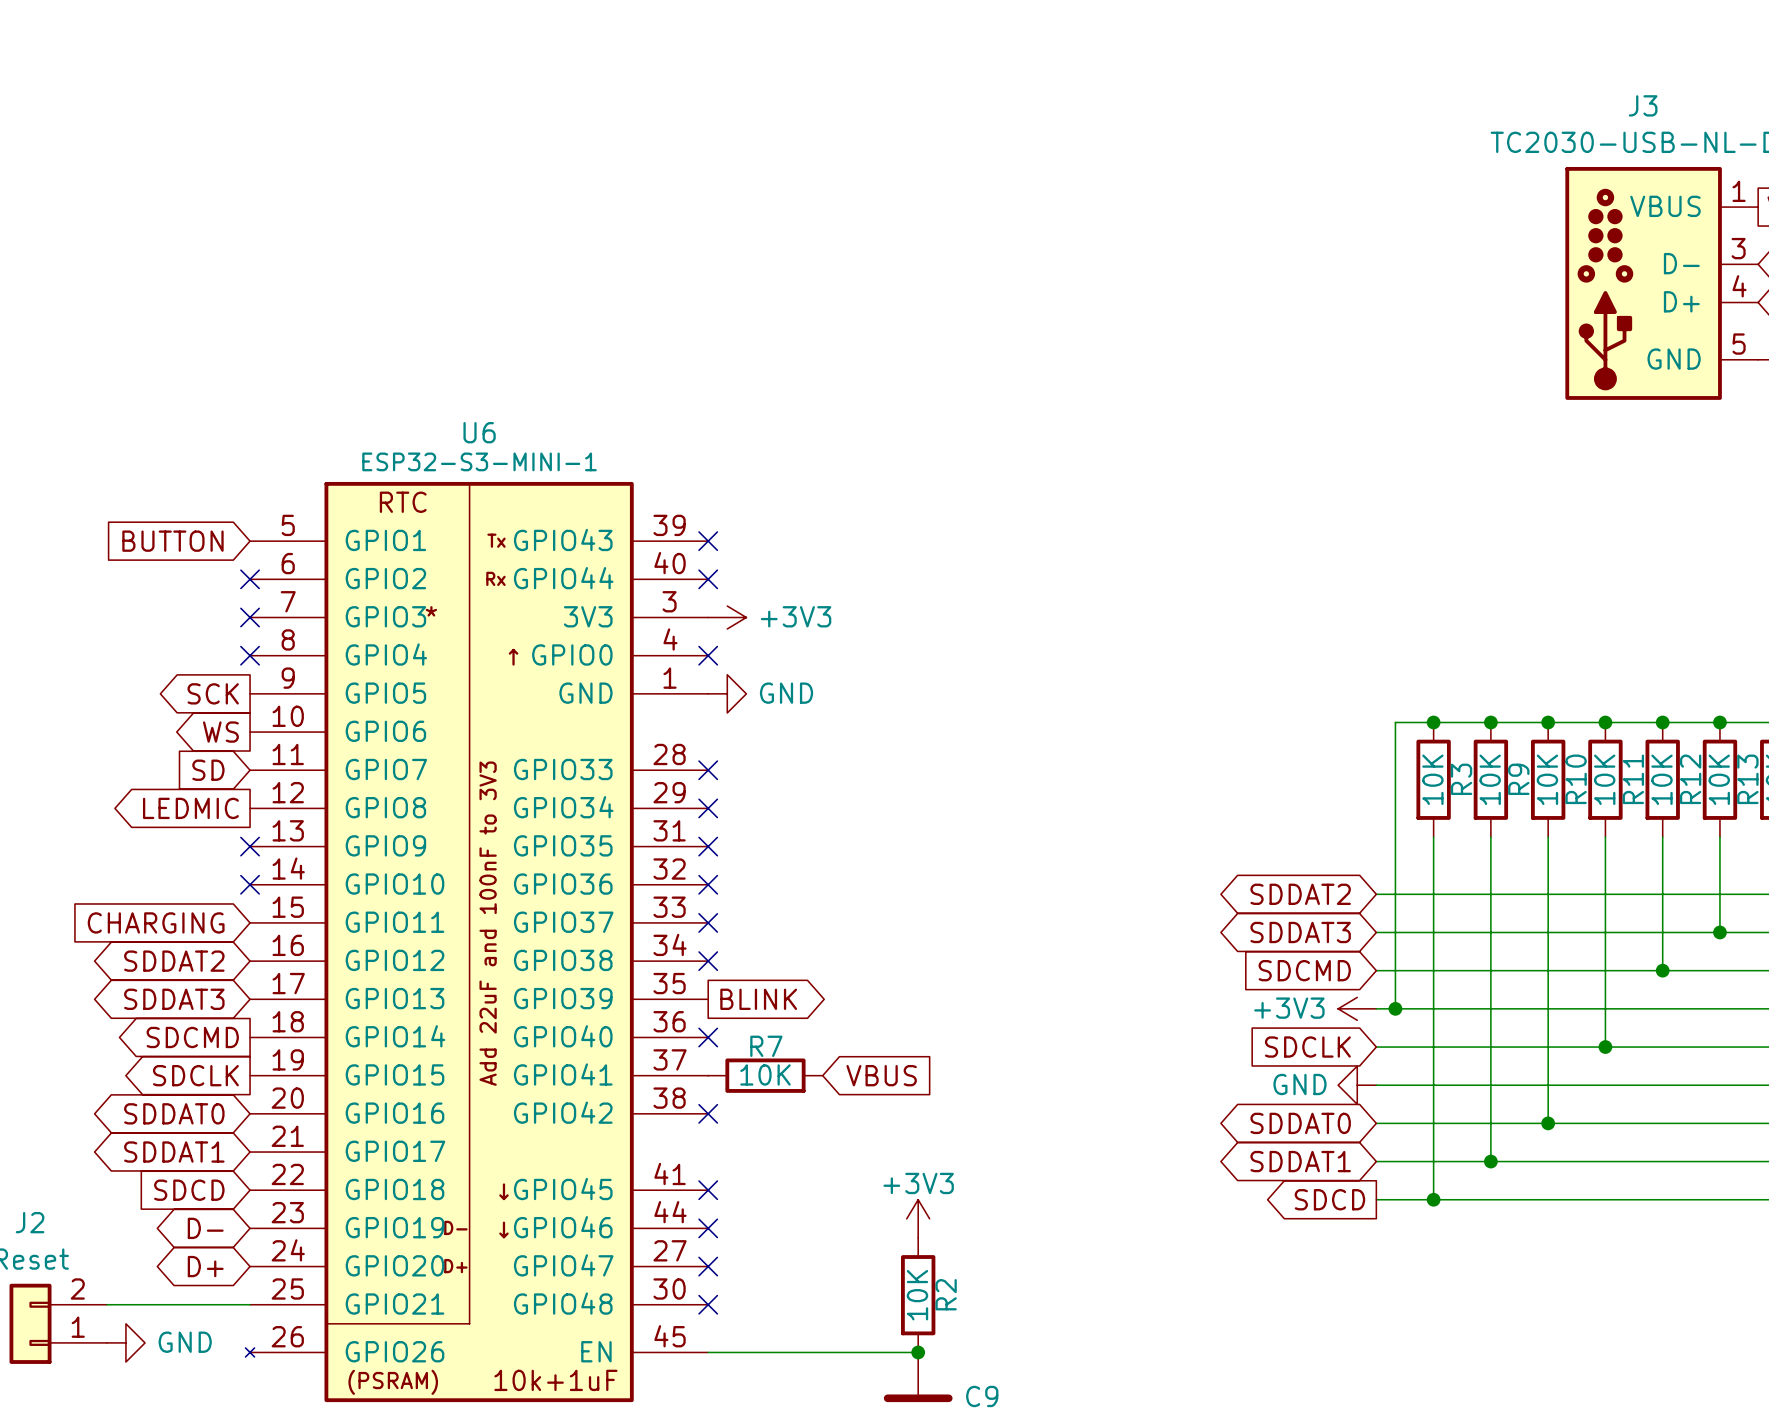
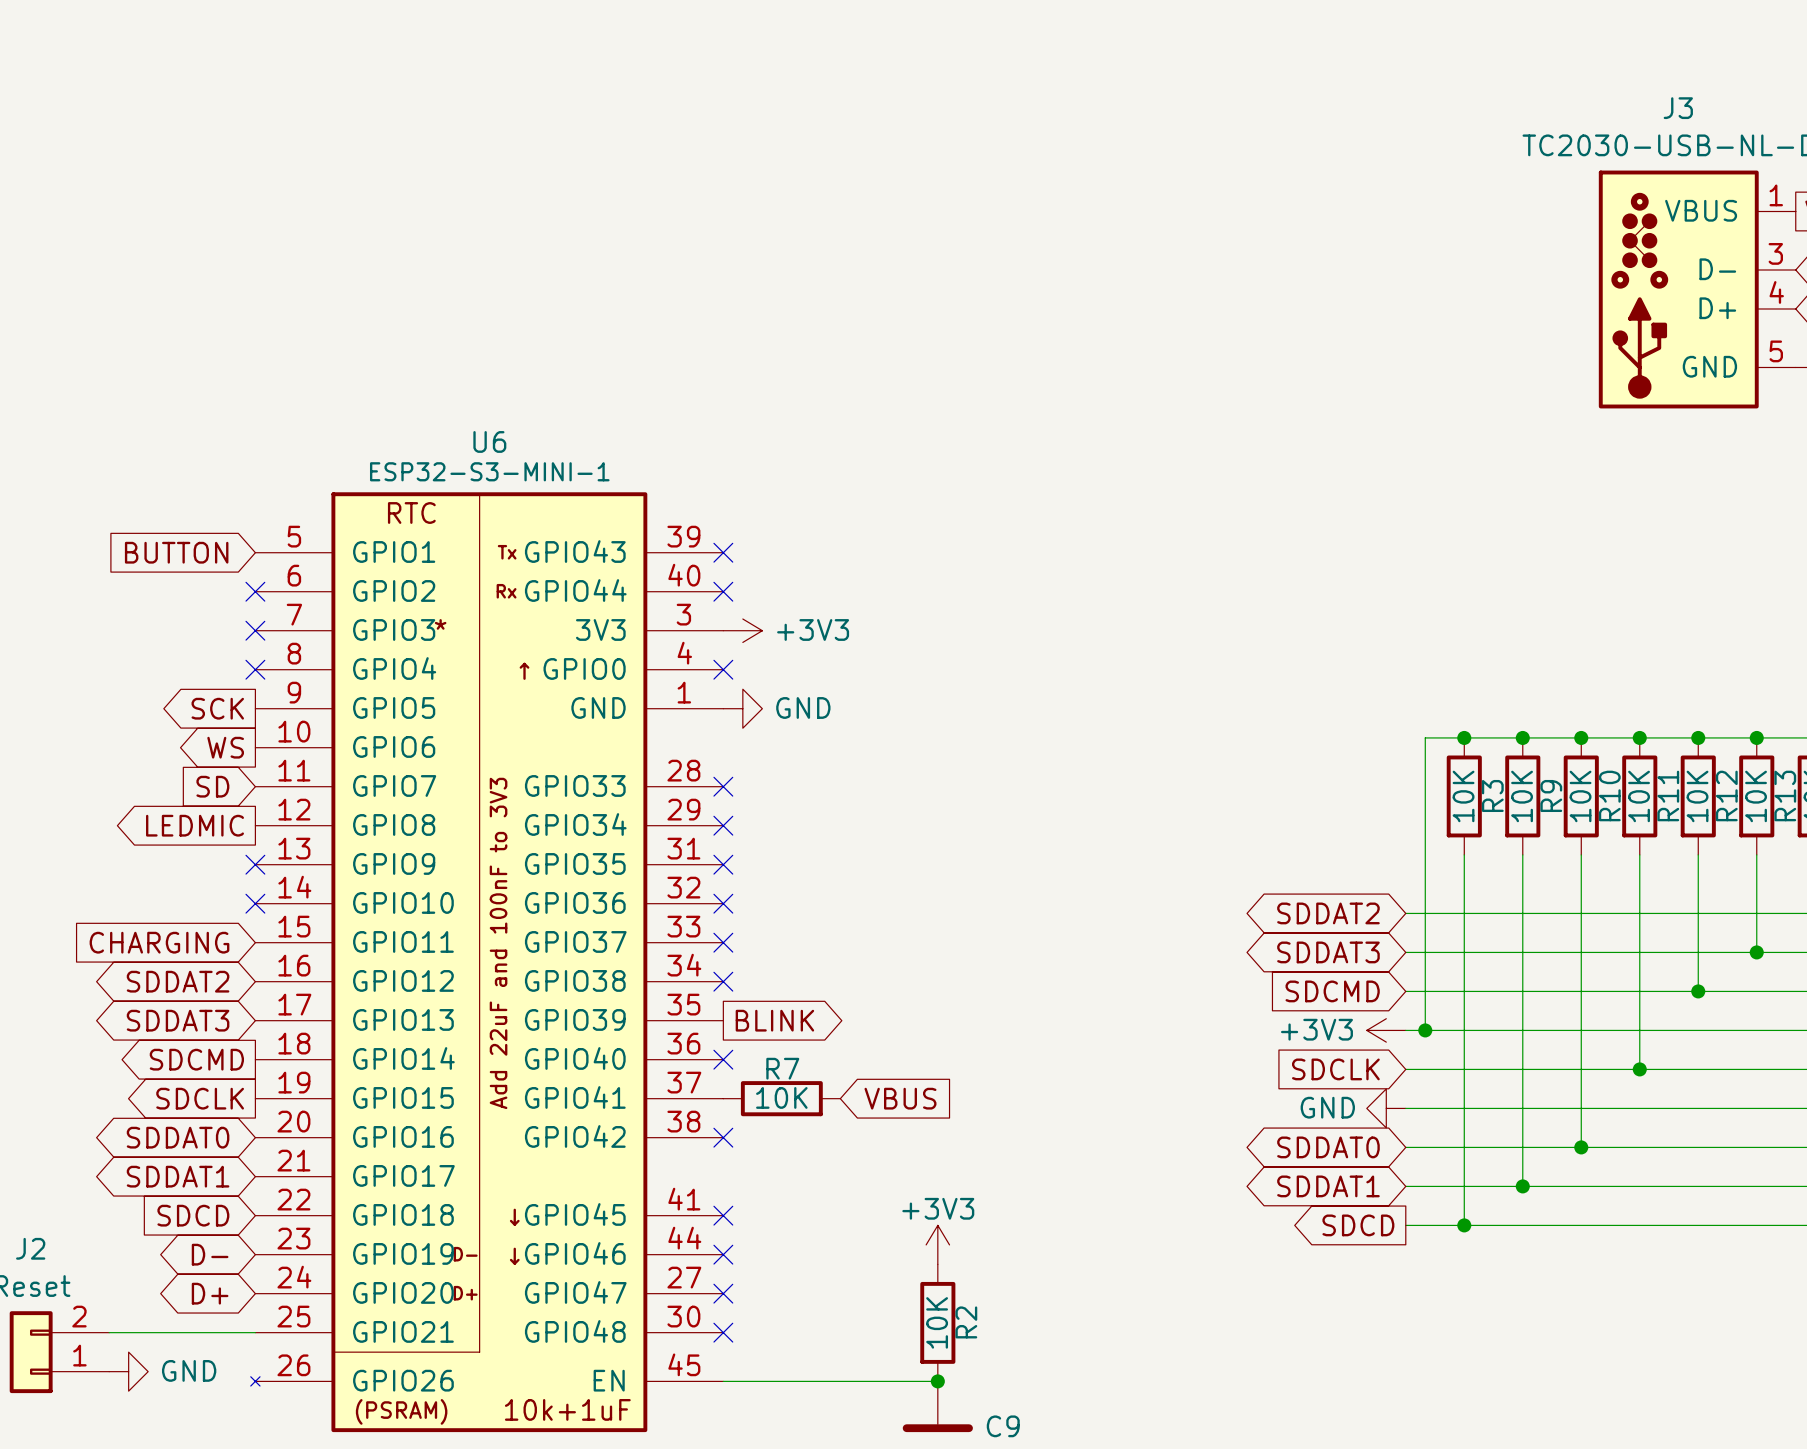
J3 symbol: [1565, 166, 1759, 400] -> [1598, 170, 1796, 409]

